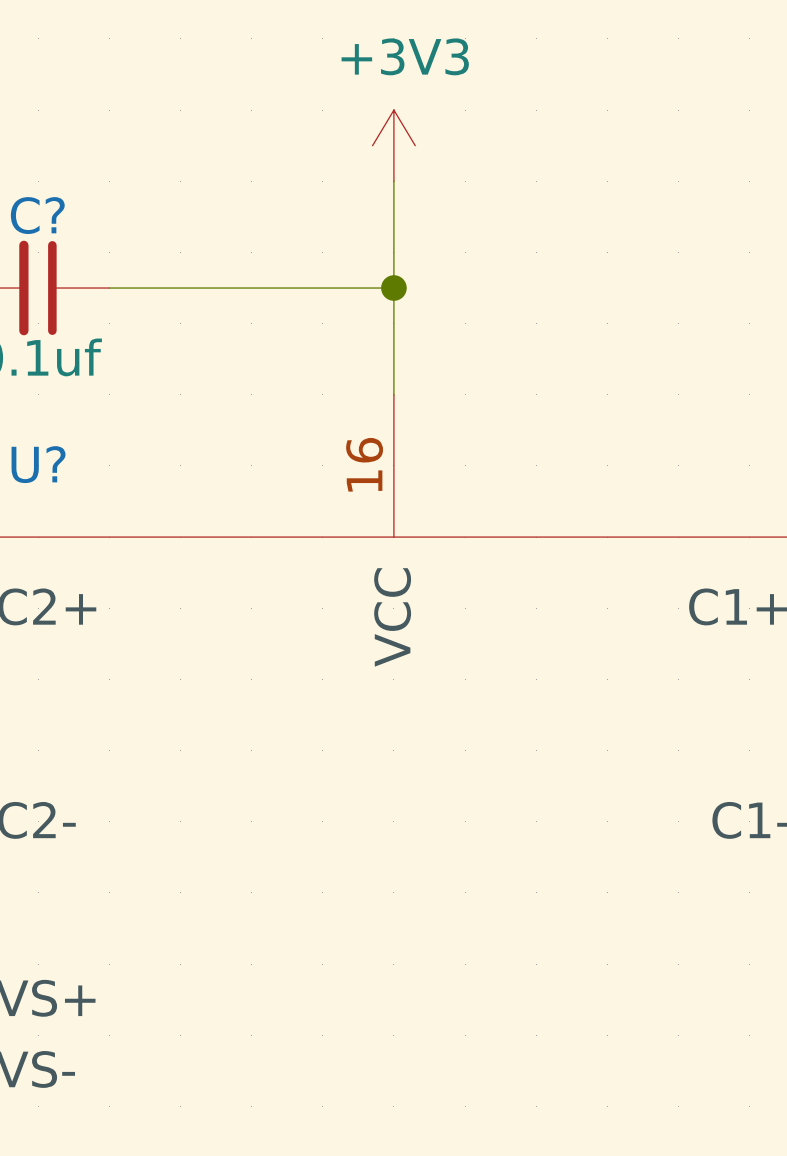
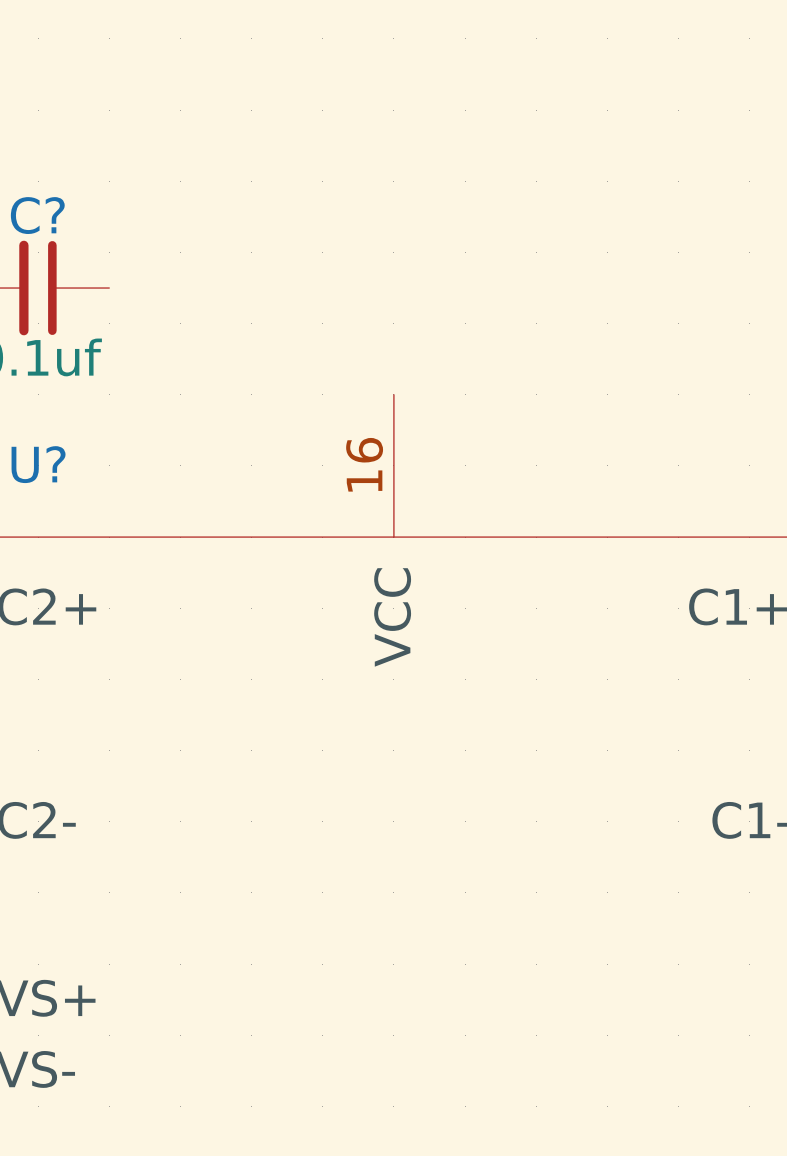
power symbol: +3V3 (393, 145) -> none
wire: (393, 181) (393, 394) -> none
wire: (109, 288) (393, 288) -> none
junction: (393, 288) -> none

